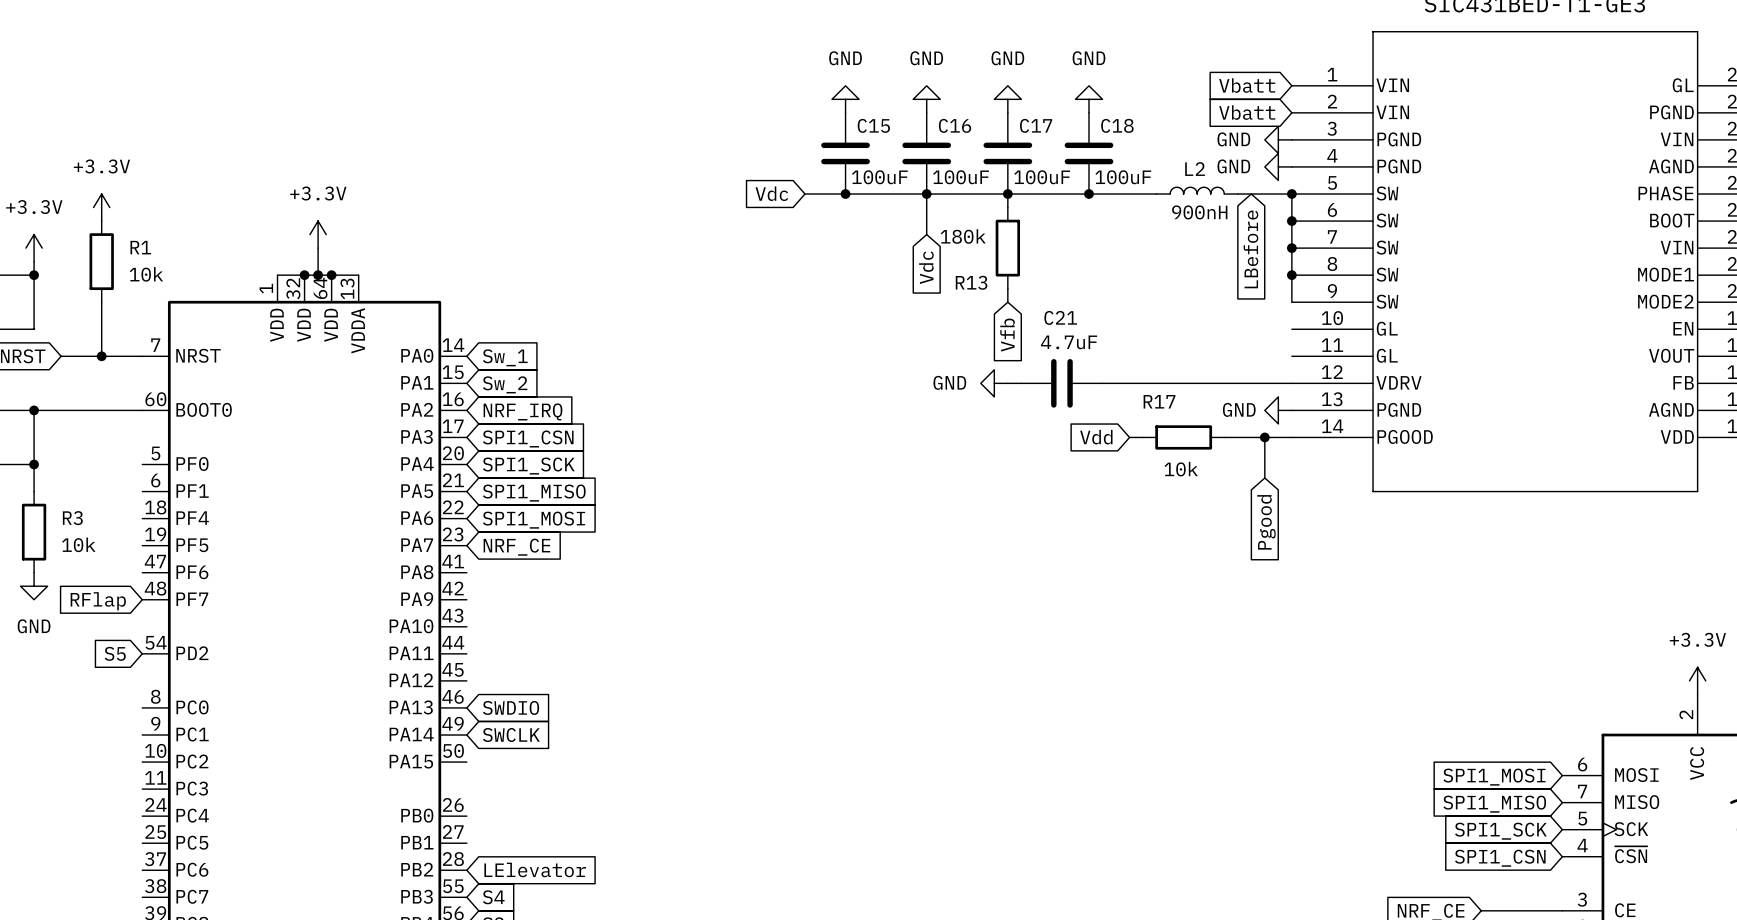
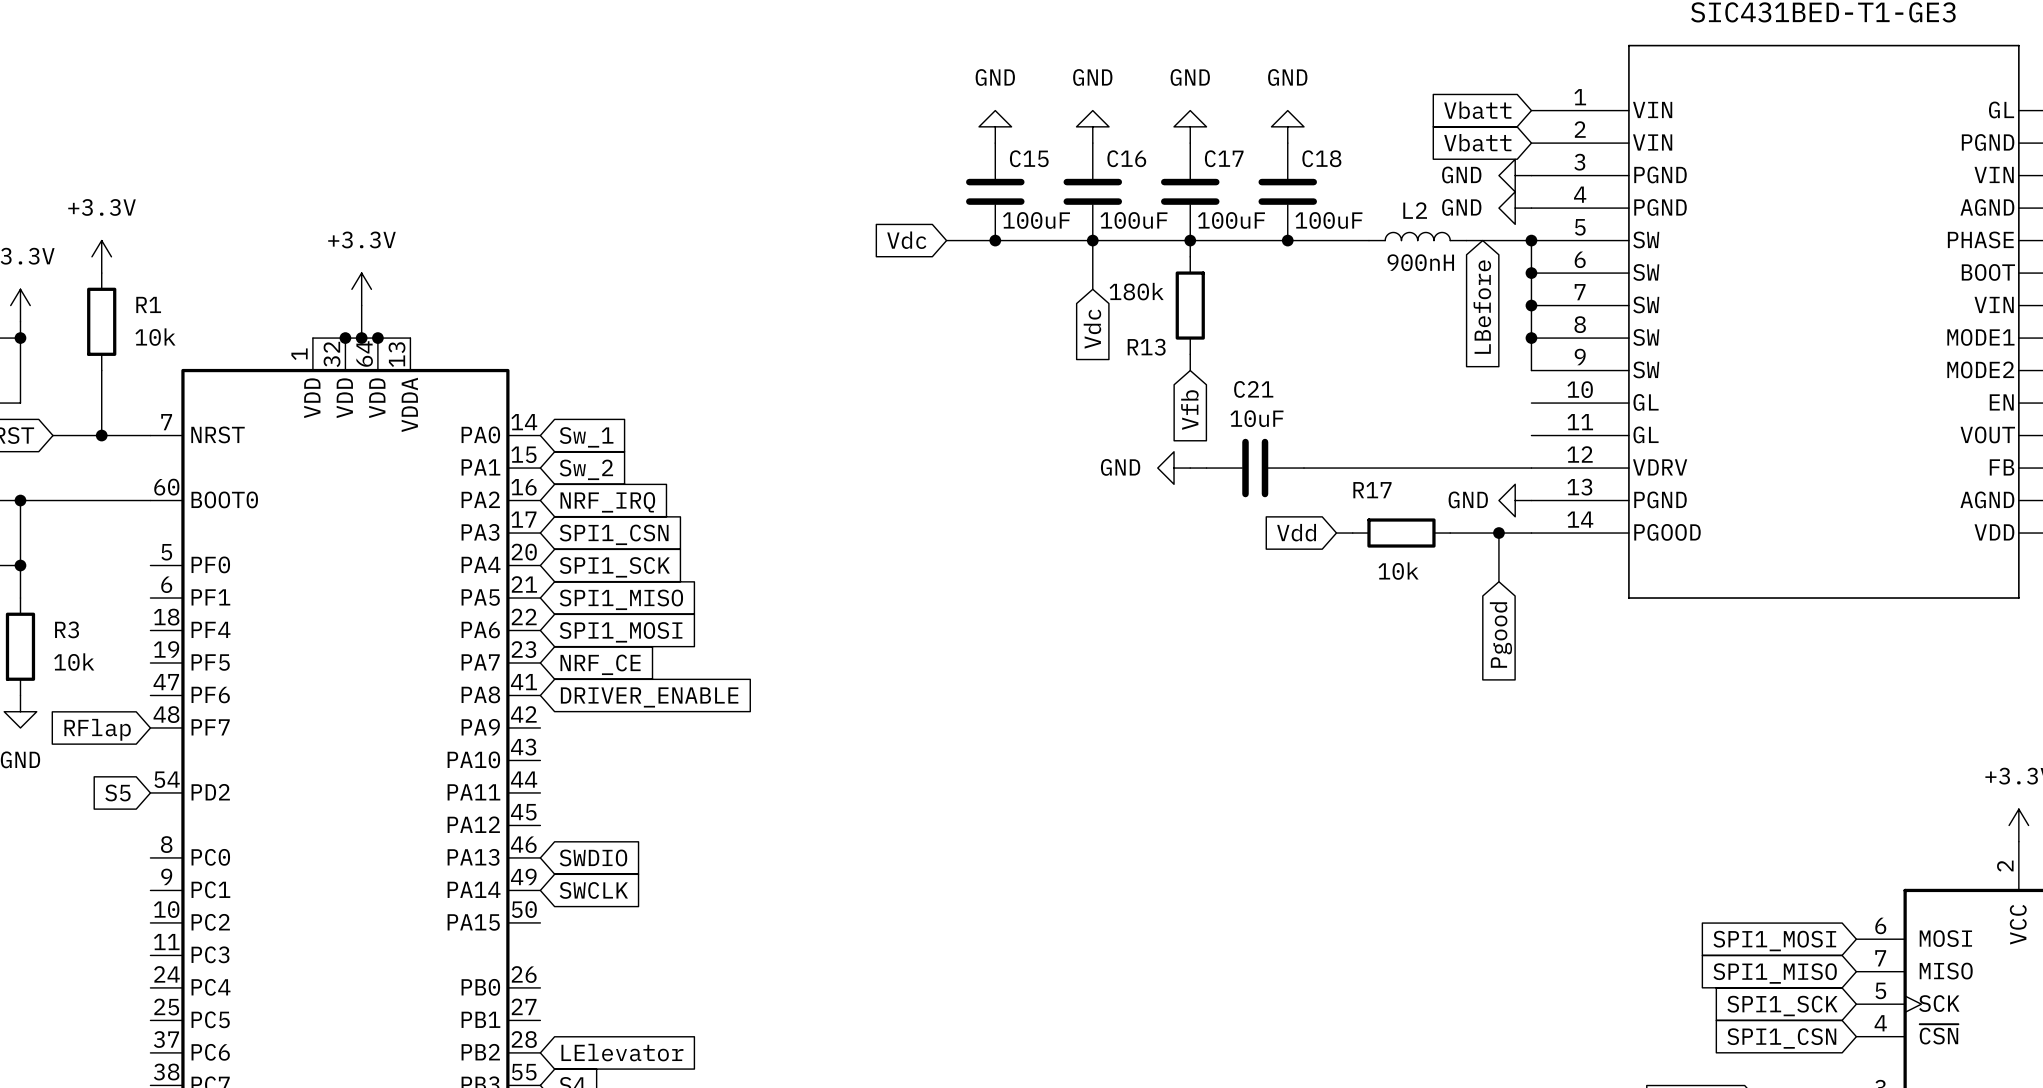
C21 value: 4.7uF (1069, 342) -> 10uF (1256, 418)
global label: none -> DRIVER_ENABLE (649, 697)

